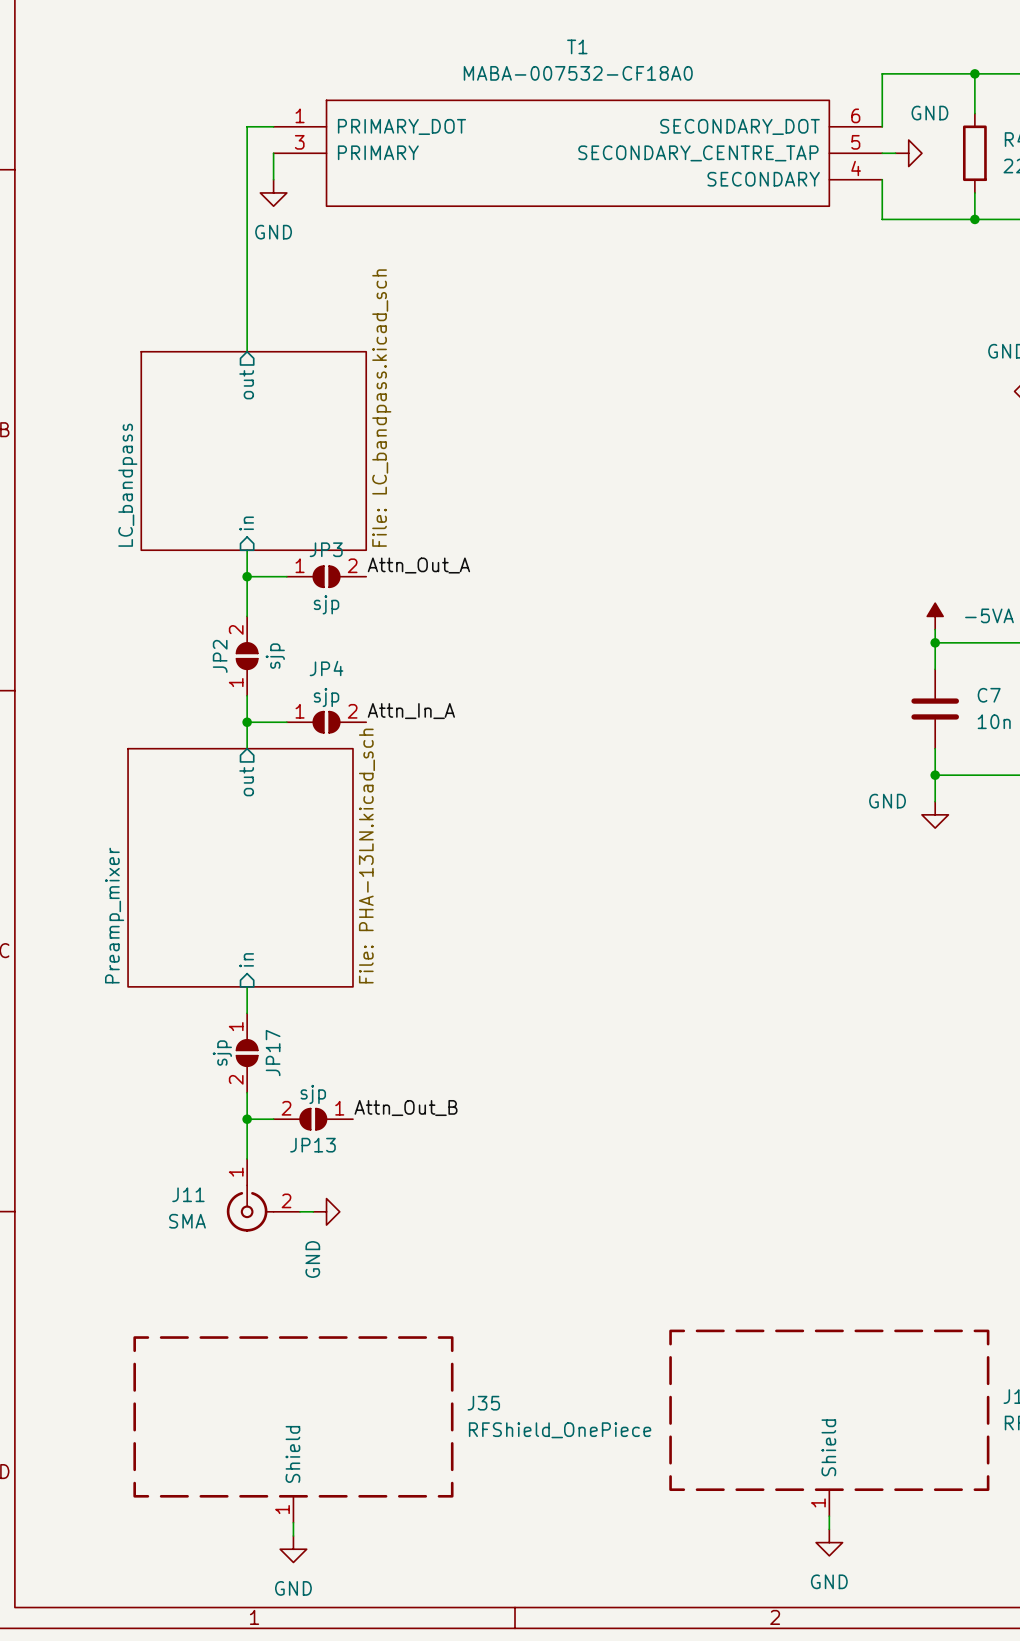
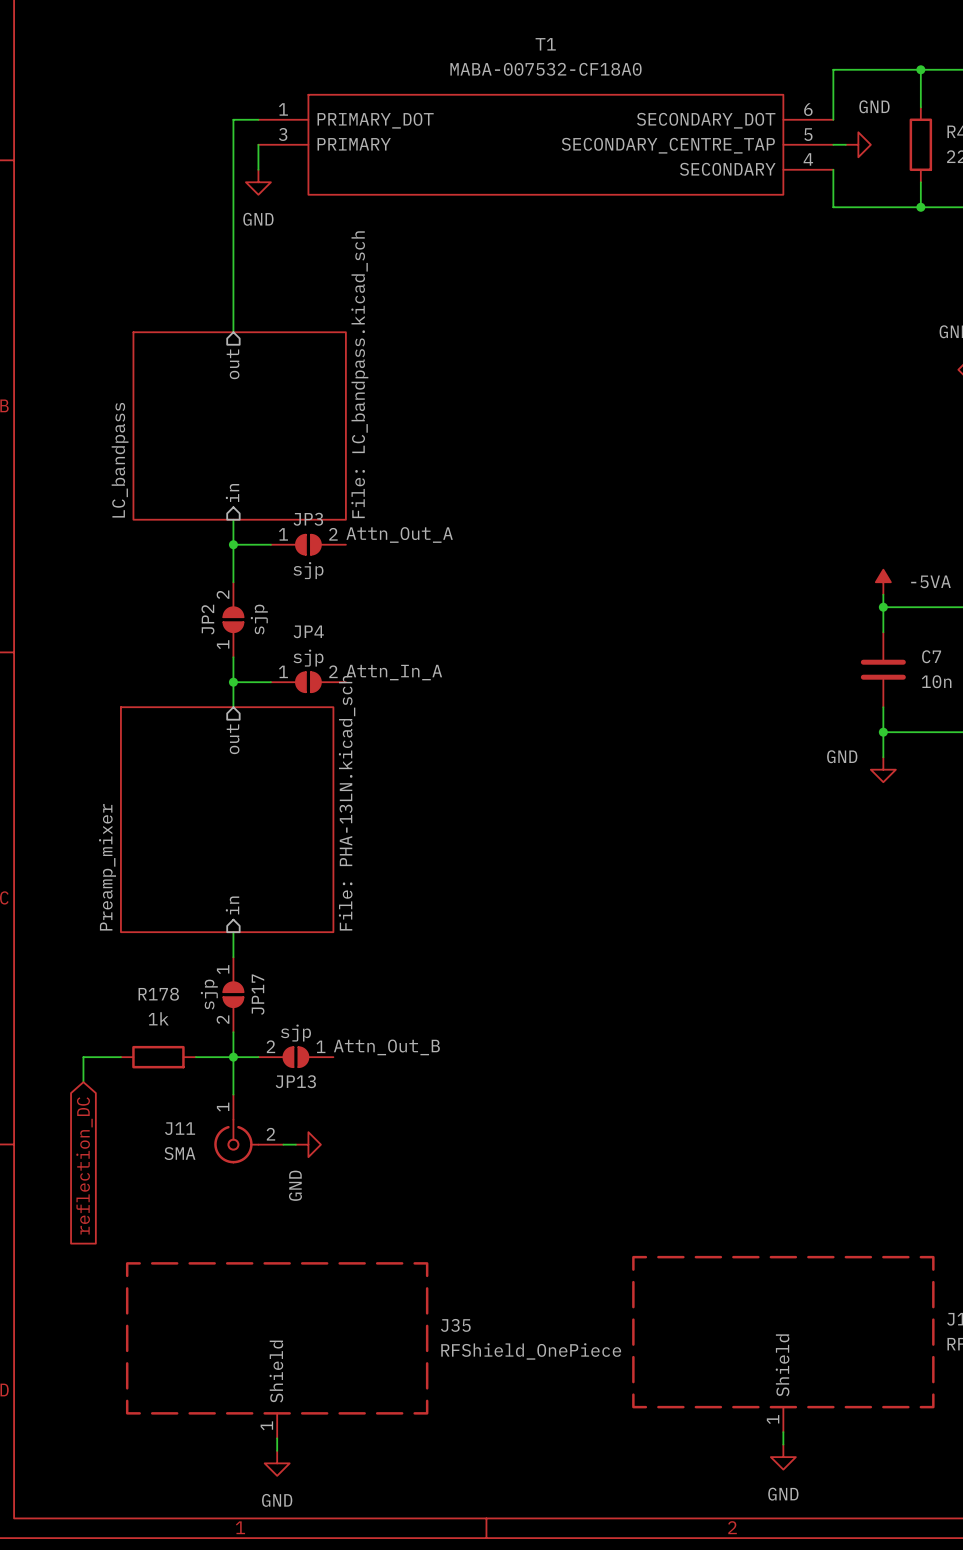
wire: none -> (120, 1057) (83, 1057) (83, 1082)
R178: none -> 1k (158, 1057)
wire: none -> (195, 1057) (233, 1057)
global label: none -> reflection_DC (84, 1165)

